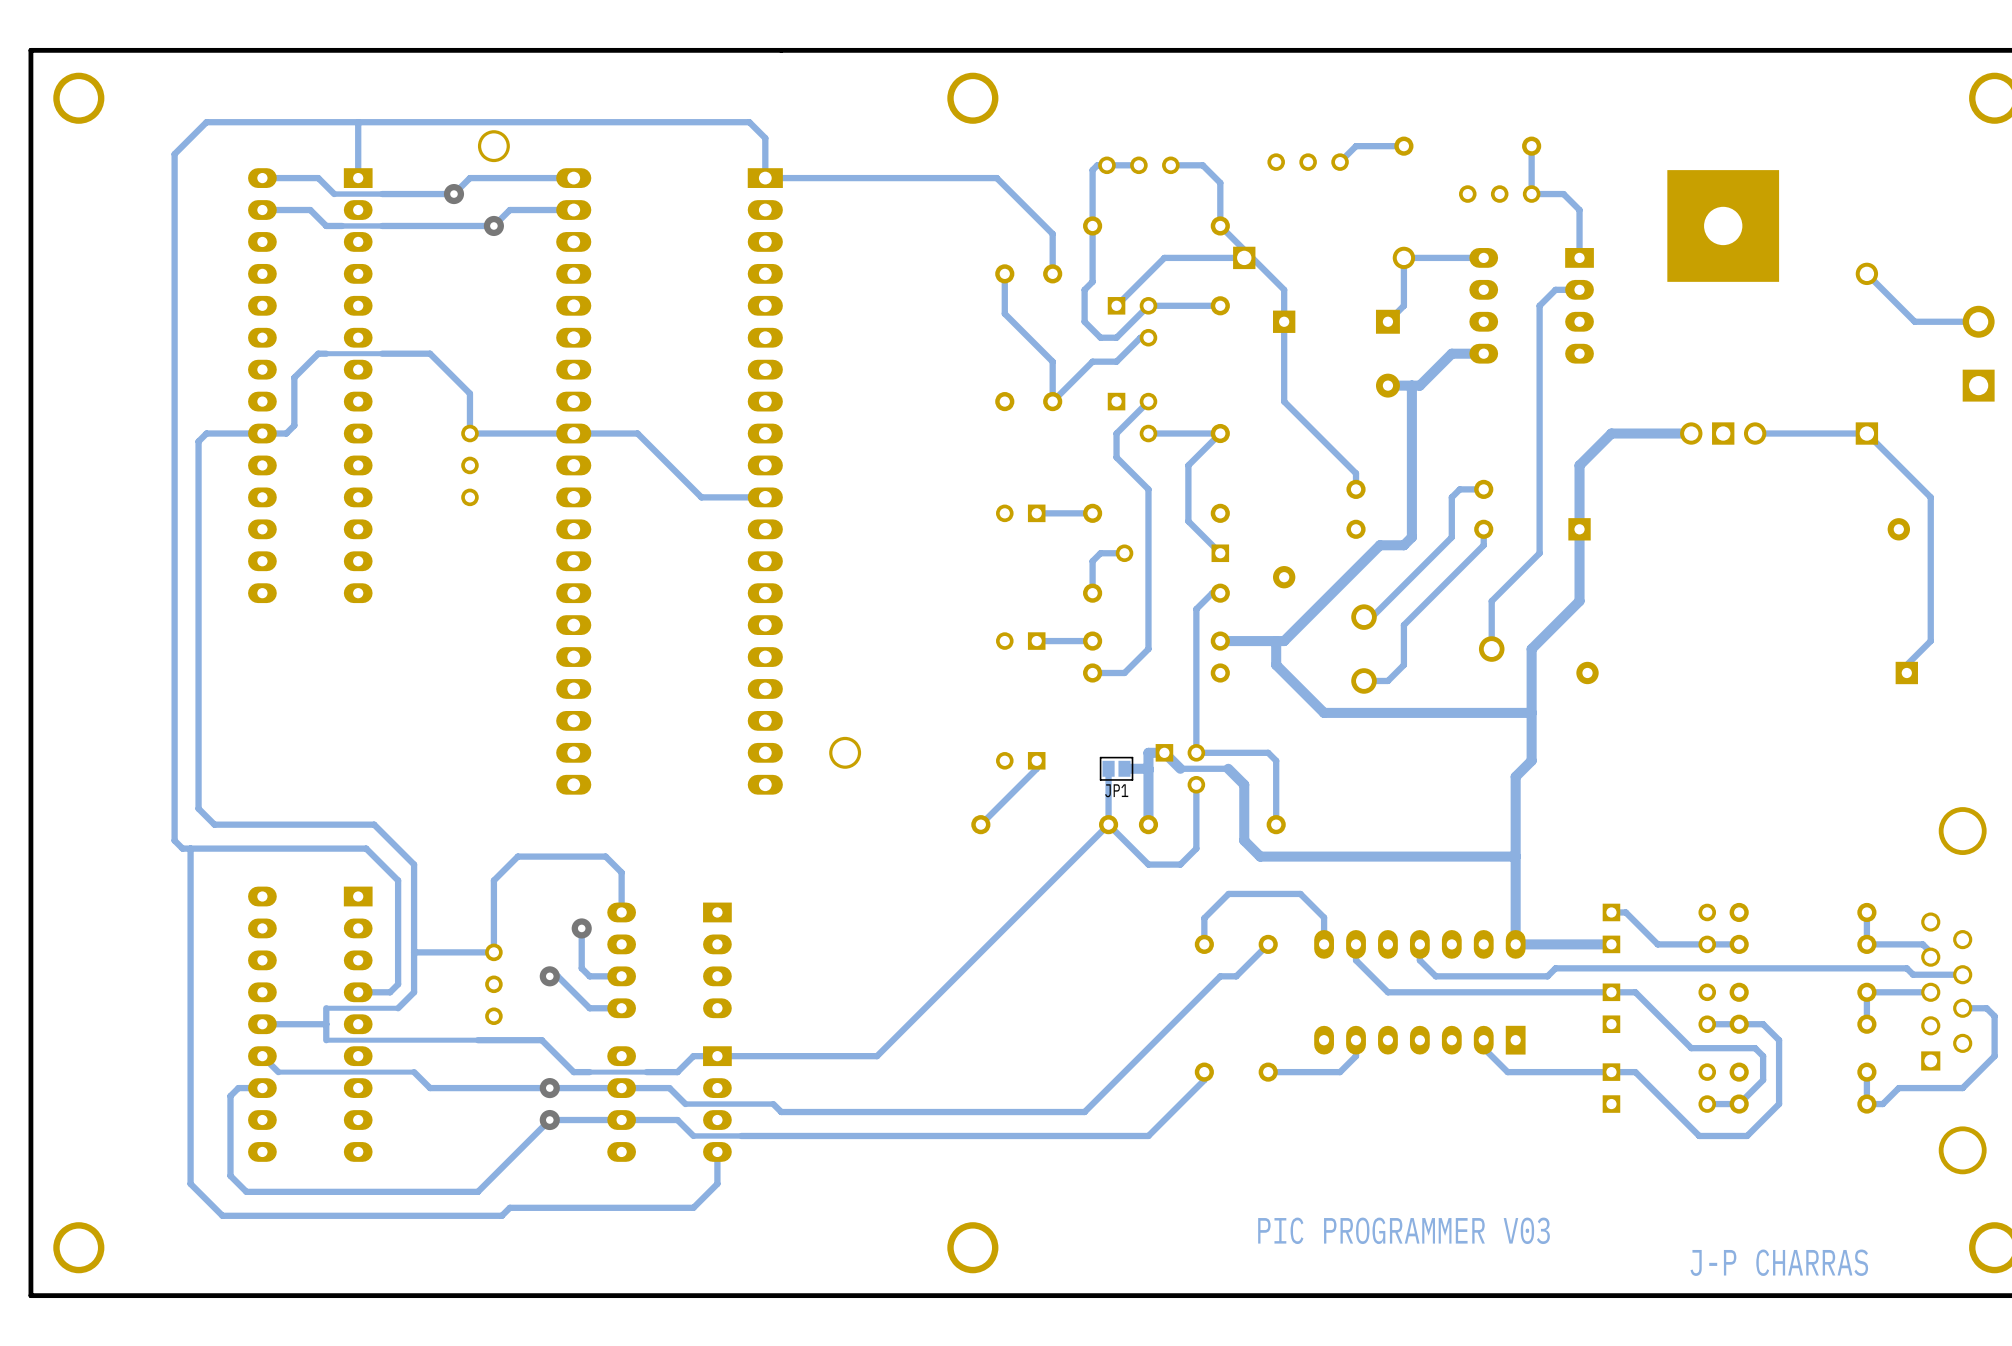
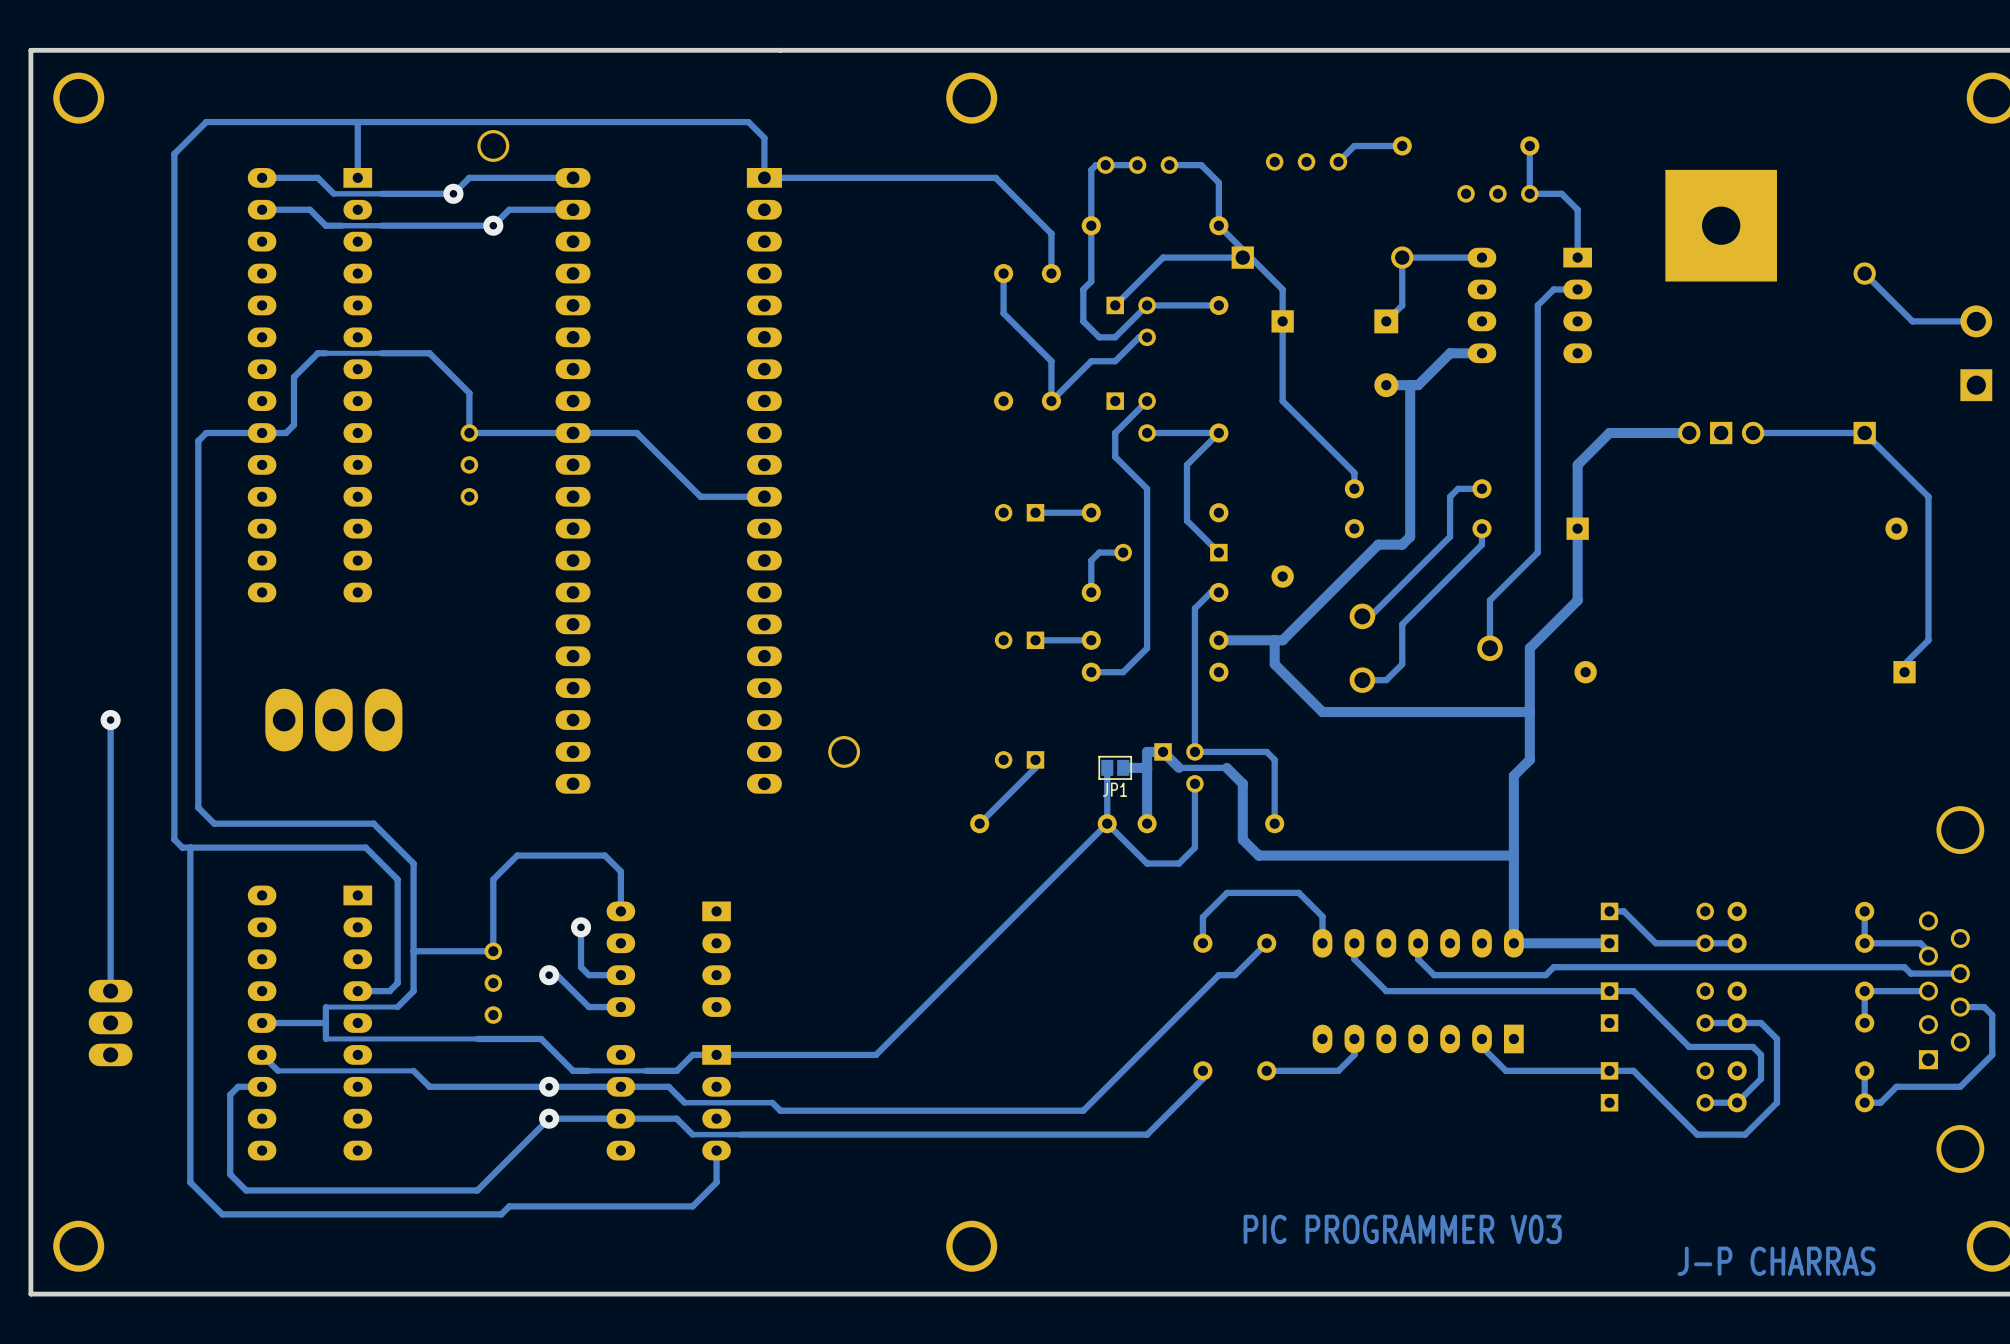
track: none -> (110, 720) (110, 991)
via: none -> (110, 720)
part: none -> (333, 720)
part: none -> (110, 1023)

